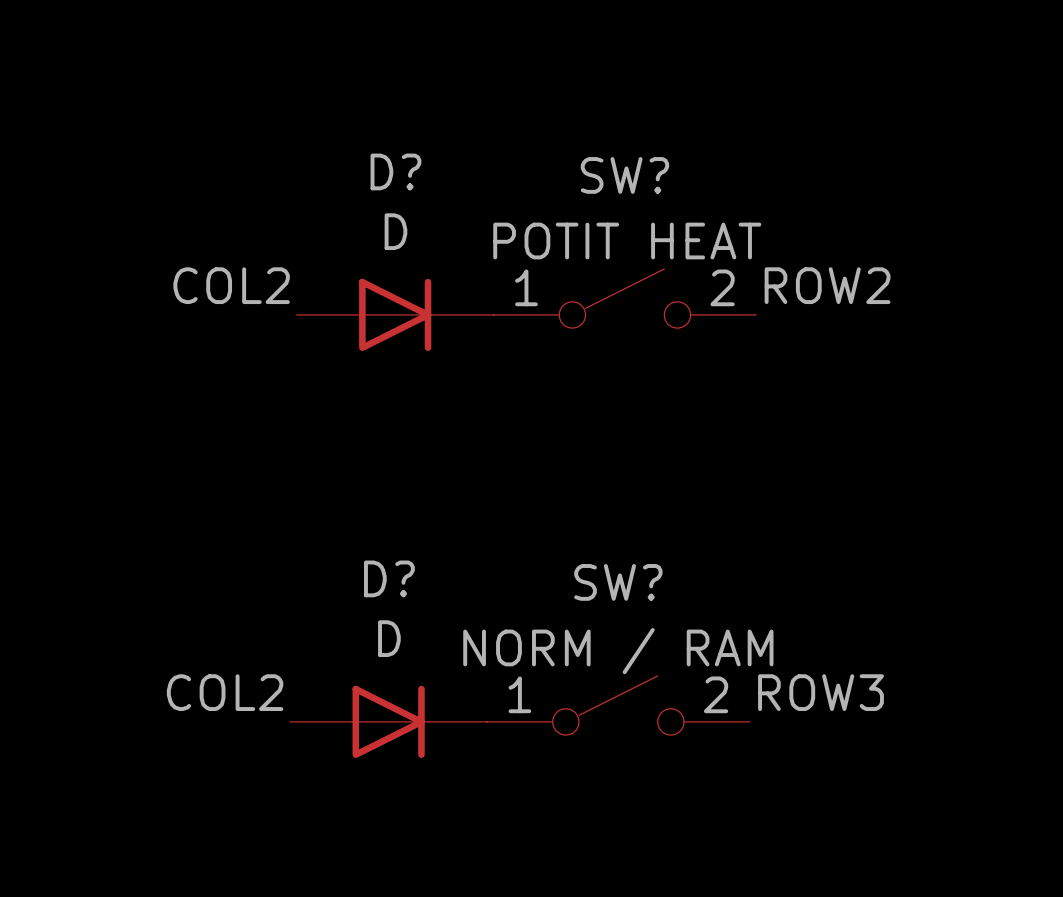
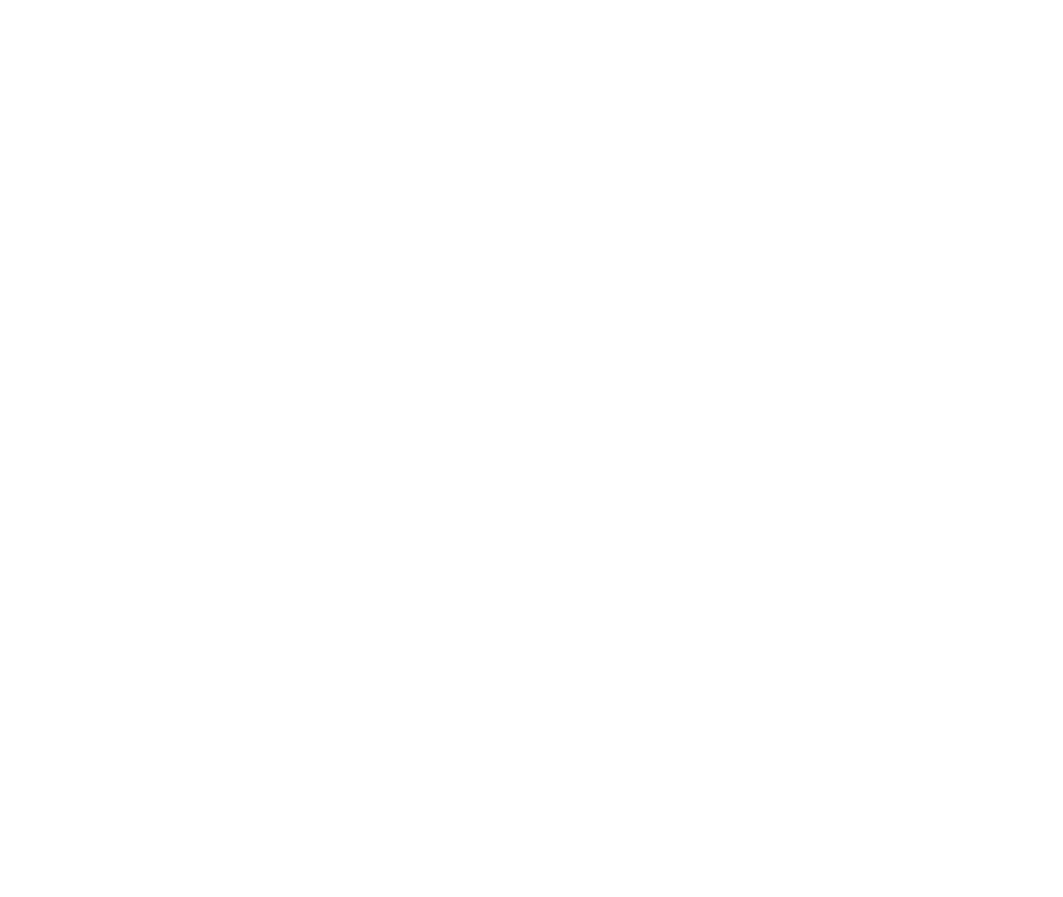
label: COL2 (231, 285) -> none
label: ROW2 (827, 285) -> none
SW?: POTIT HEAT (624, 298) -> none
D?: D (395, 314) -> none
label: COL2 (225, 692) -> none
label: ROW3 (821, 692) -> none
SW?: NORM / RAM (618, 705) -> none
D?: D (388, 721) -> none

